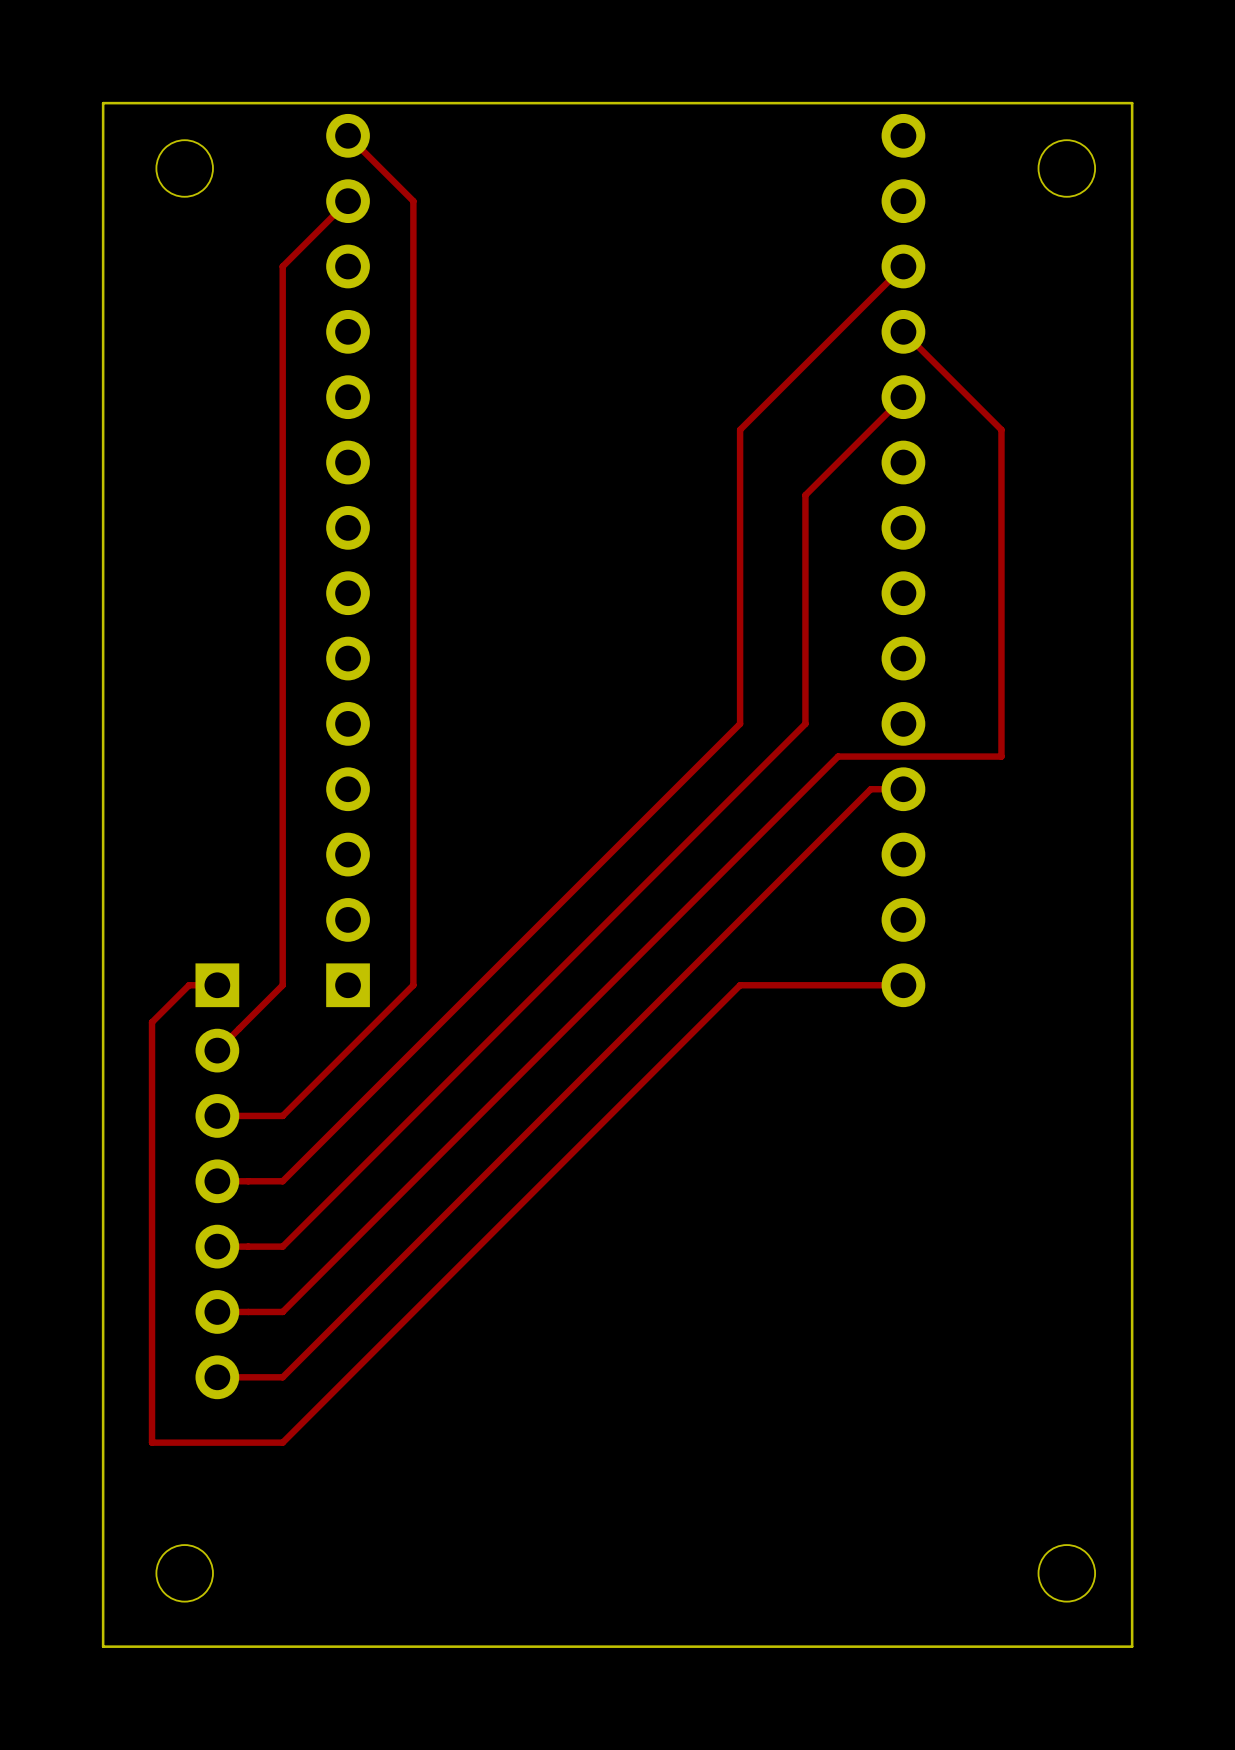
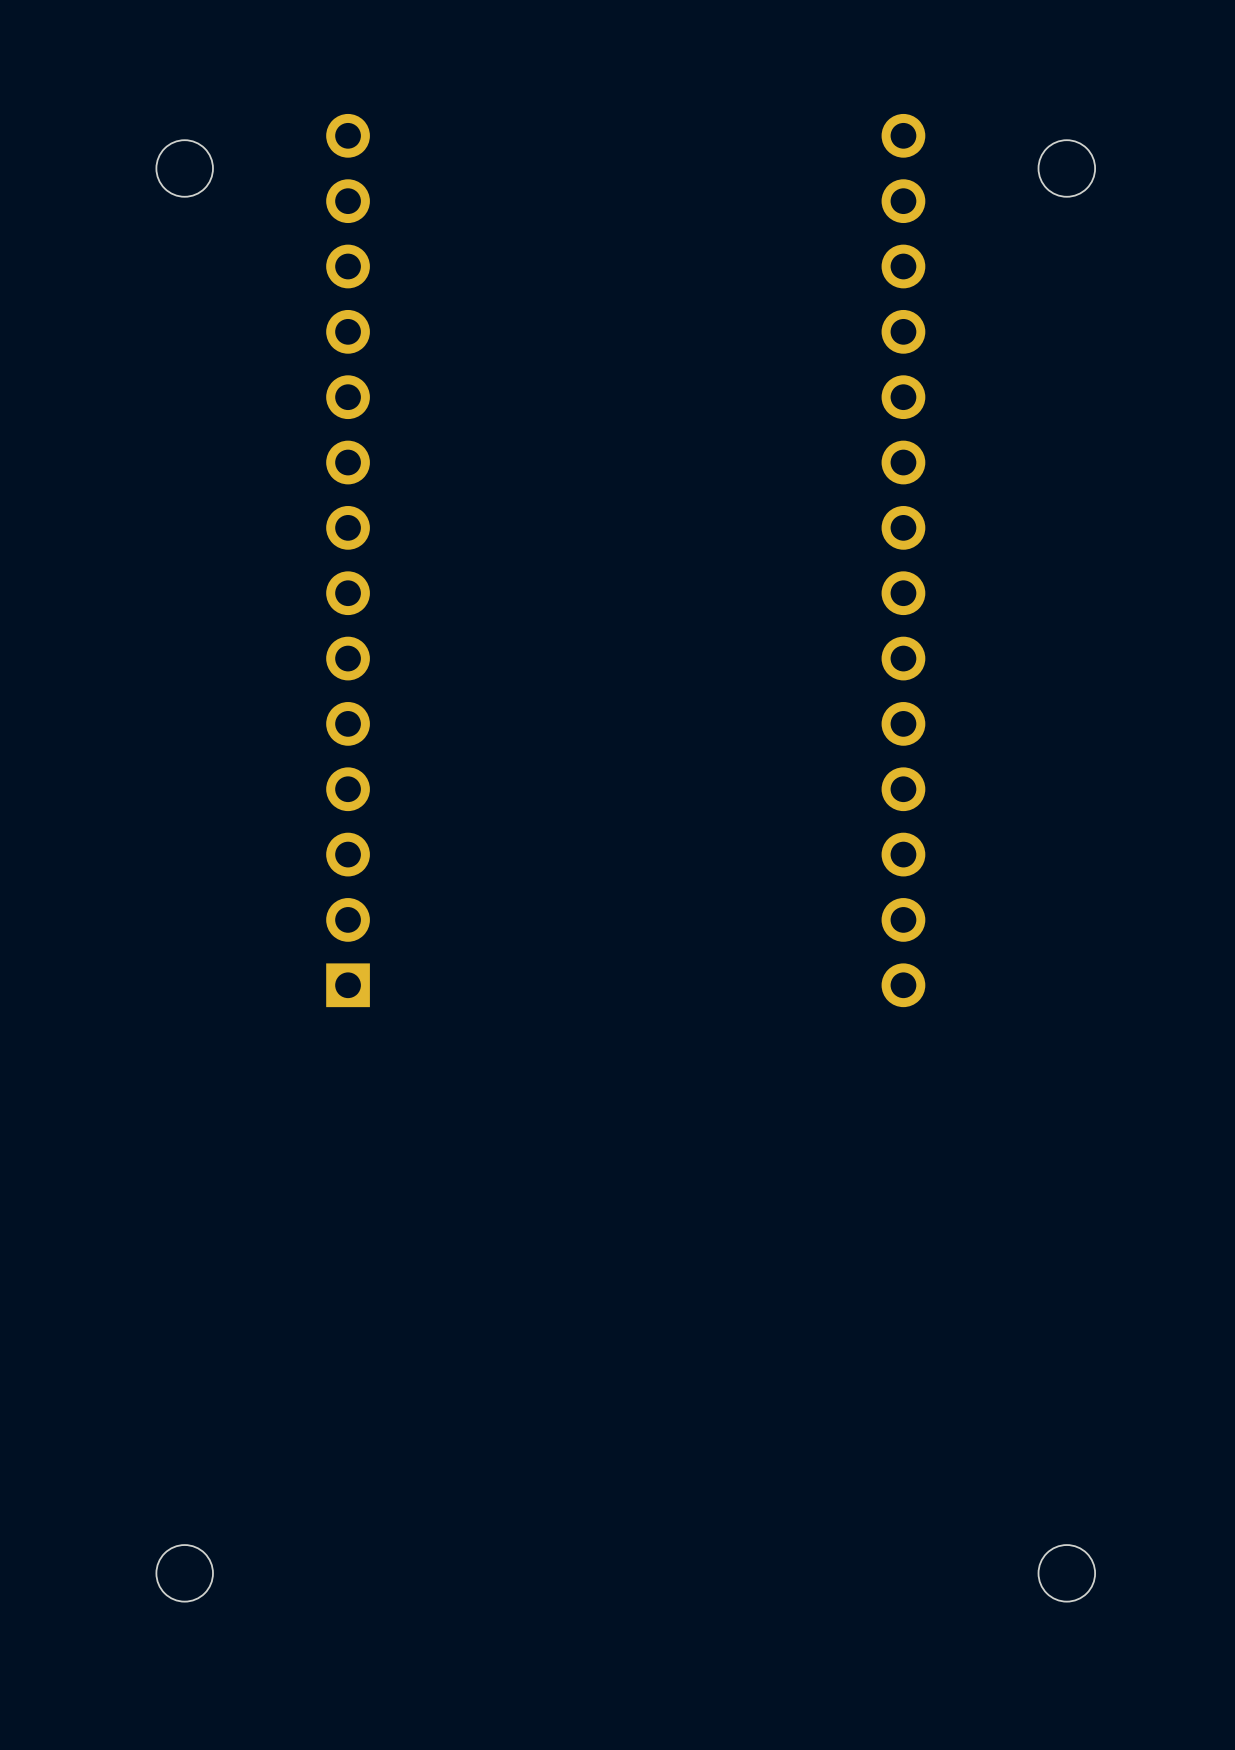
board edge: (1132, 103) (103, 103) (103, 1646) (1132, 1646) (1132, 103) -> none
top track: (348, 135) (413, 201) (413, 985) (282, 1115) (217, 1115) -> none
top track: (348, 201) (282, 266) (282, 985) (217, 1050) -> none
top track: (903, 266) (740, 429) (740, 723) (282, 1181) (217, 1181) -> none
top track: (903, 331) (1001, 429) (1001, 756) (838, 756) (282, 1311) (217, 1311) -> none
top track: (903, 397) (805, 495) (805, 723) (282, 1246) (217, 1246) -> none
top track: (903, 789) (870, 789) (282, 1377) (217, 1377) -> none
top track: (903, 985) (740, 985) (282, 1442) (152, 1442) (152, 1022) (189, 985) (217, 985) -> none
part: (217, 1181) -> none

